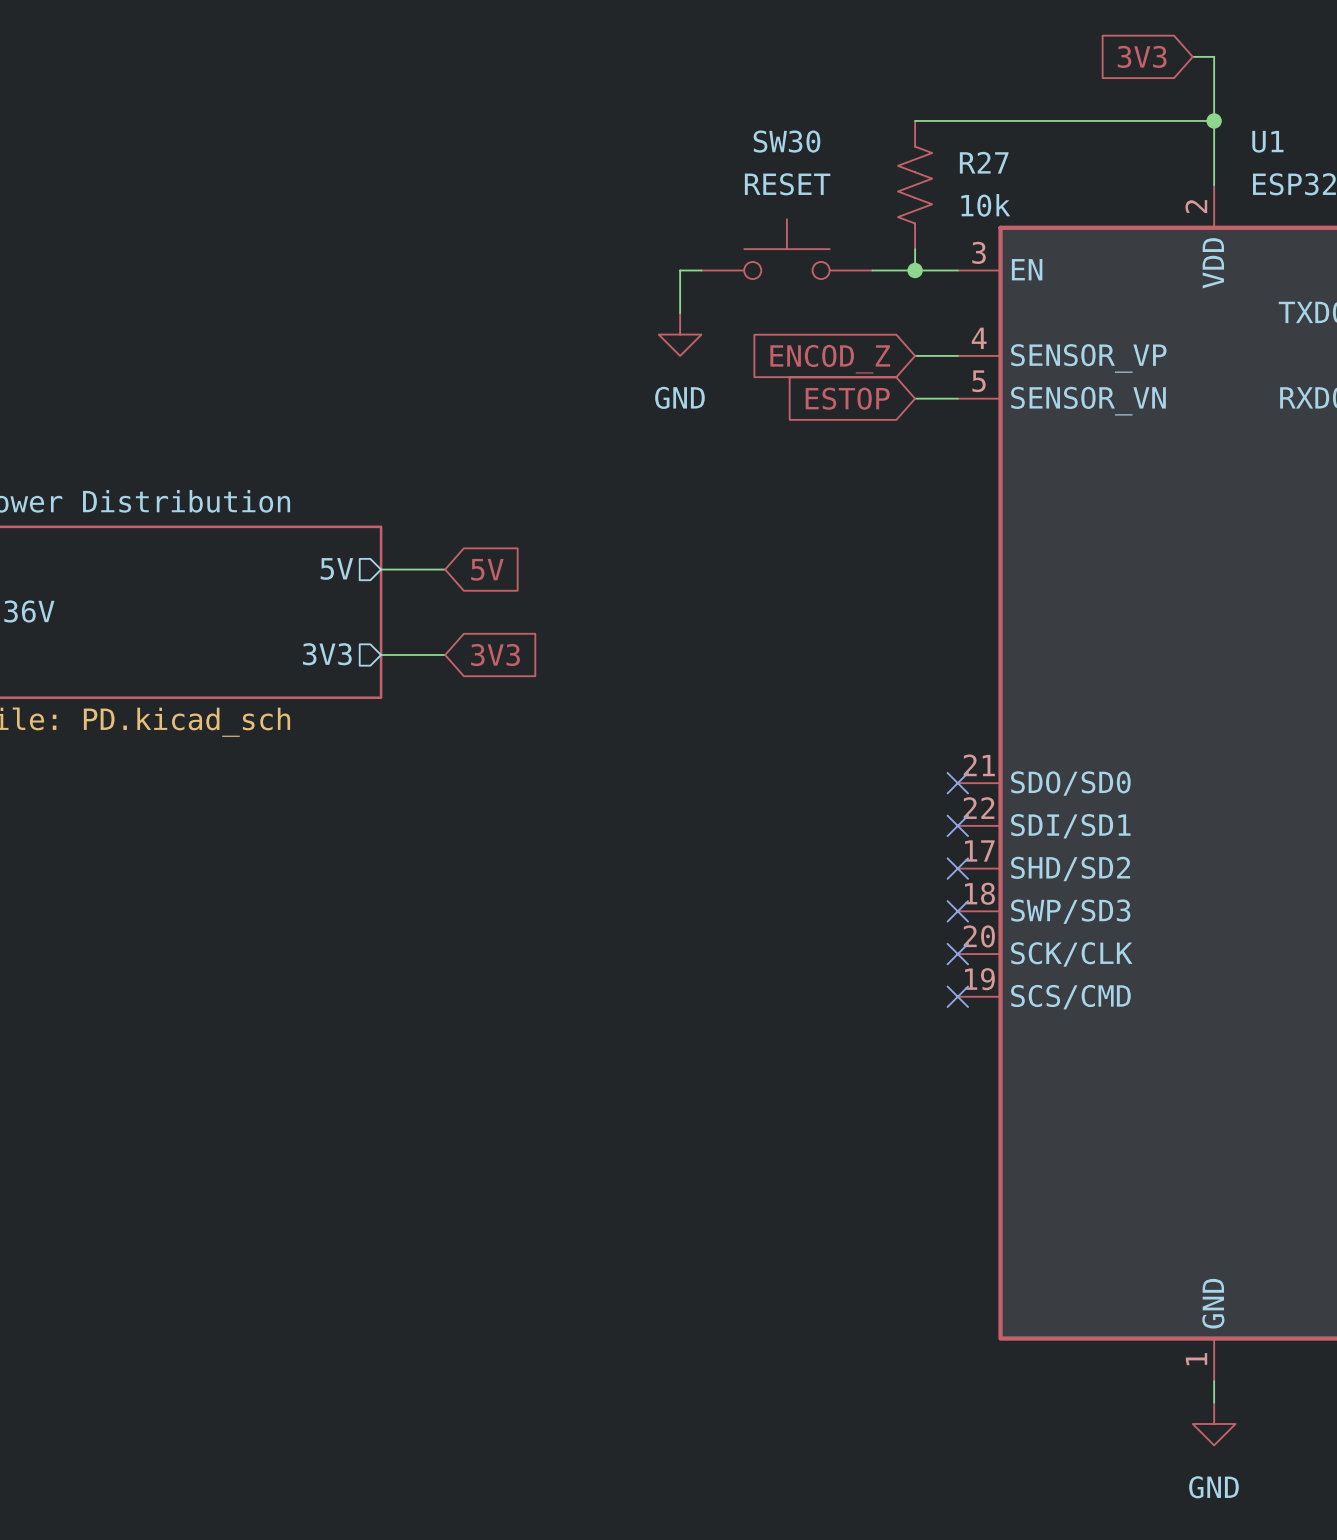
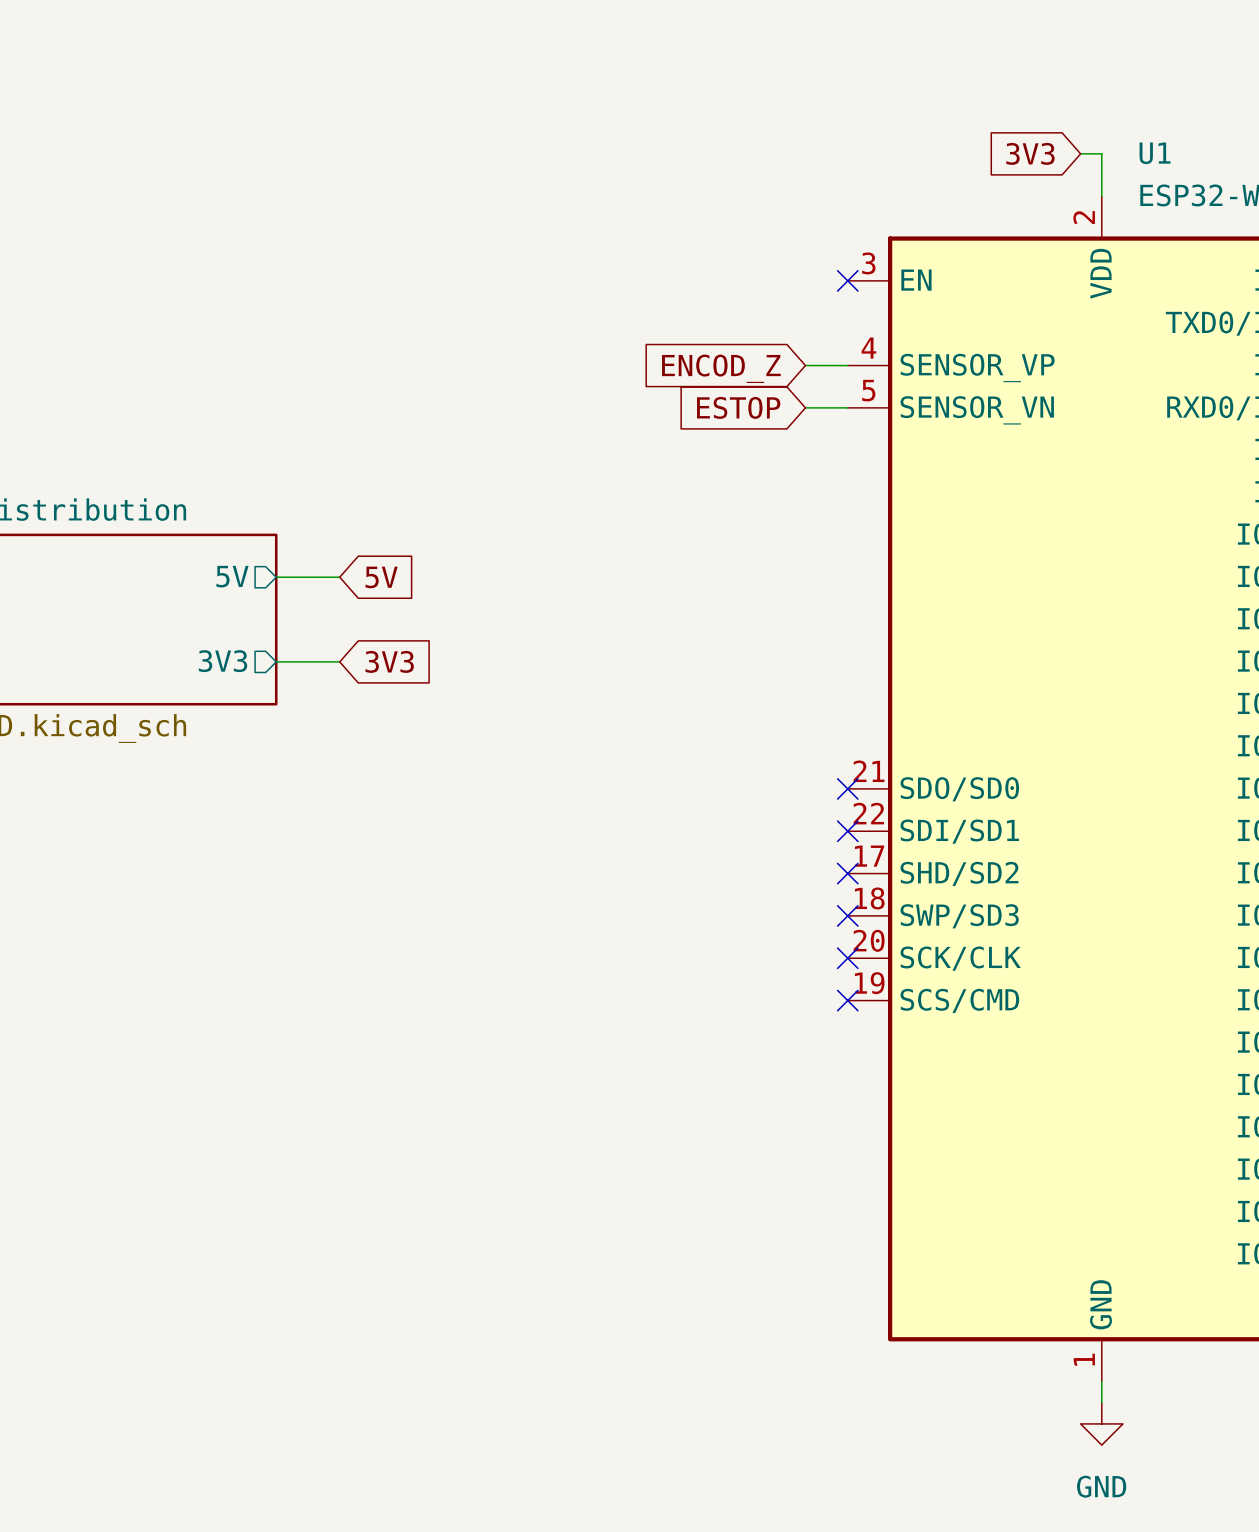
global label position: 3V3 (1142, 56) -> 3V3 (1030, 153)
wire: (1192, 56) (1214, 56) (1214, 142) -> (1080, 153) (1101, 153)
wire: (915, 120) (1214, 120) -> none
junction: (1214, 120) -> none
R27: 10k (915, 185) -> none
SW30: RESET (786, 249) -> none
wire: (915, 249) (915, 270) -> none
wire: (701, 270) (680, 270) (680, 313) -> none
wire: (872, 270) (957, 270) -> none
junction: (915, 270) -> none
no-connect mark: none -> (847, 280)
power symbol: GND (680, 334) -> none

